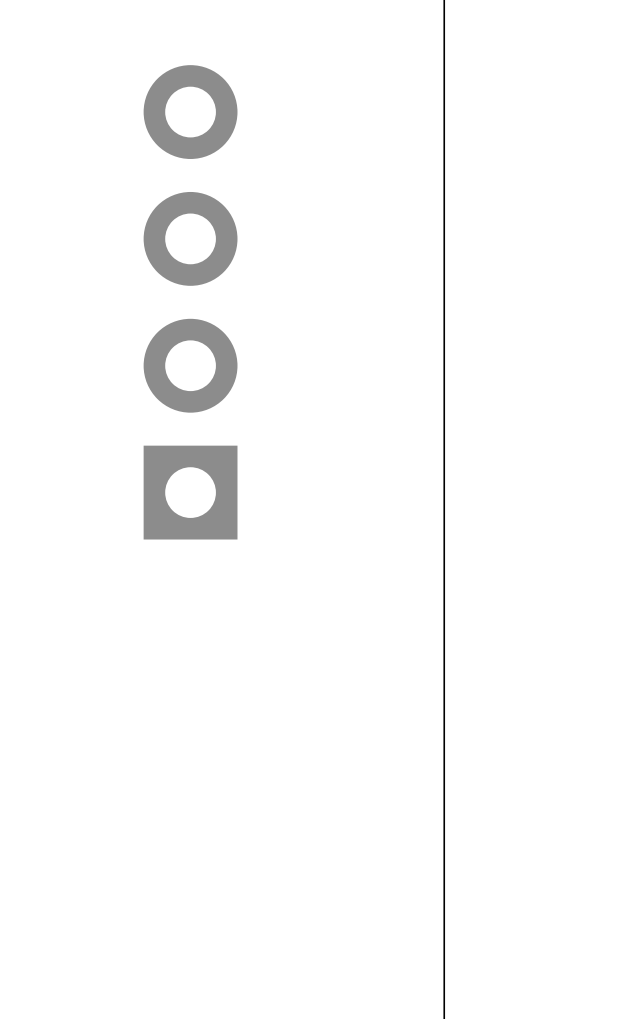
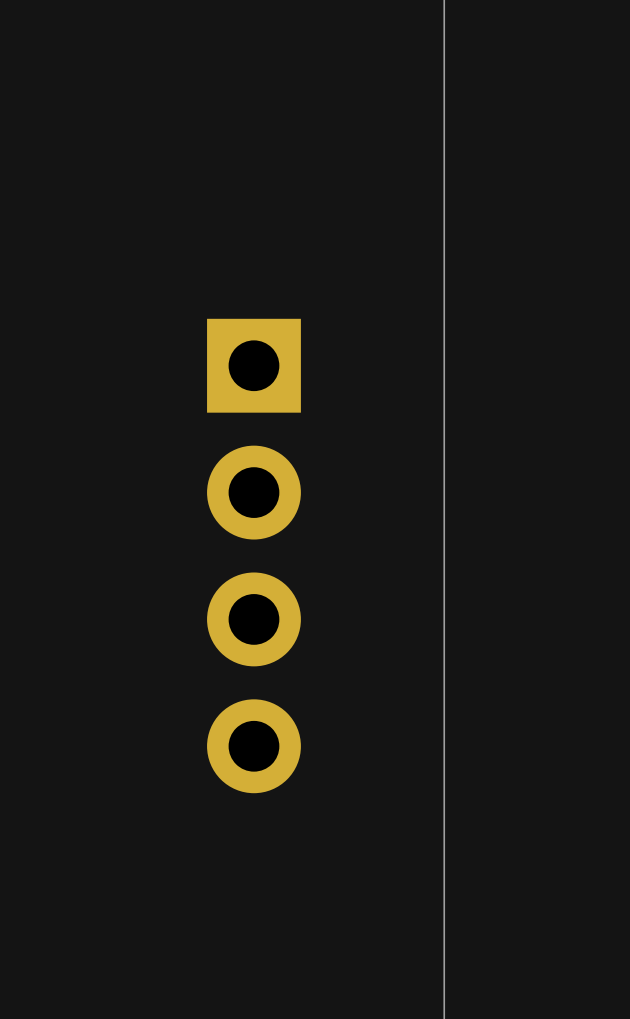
part rotation: 0° (190, 302) -> 180° (253, 556)

